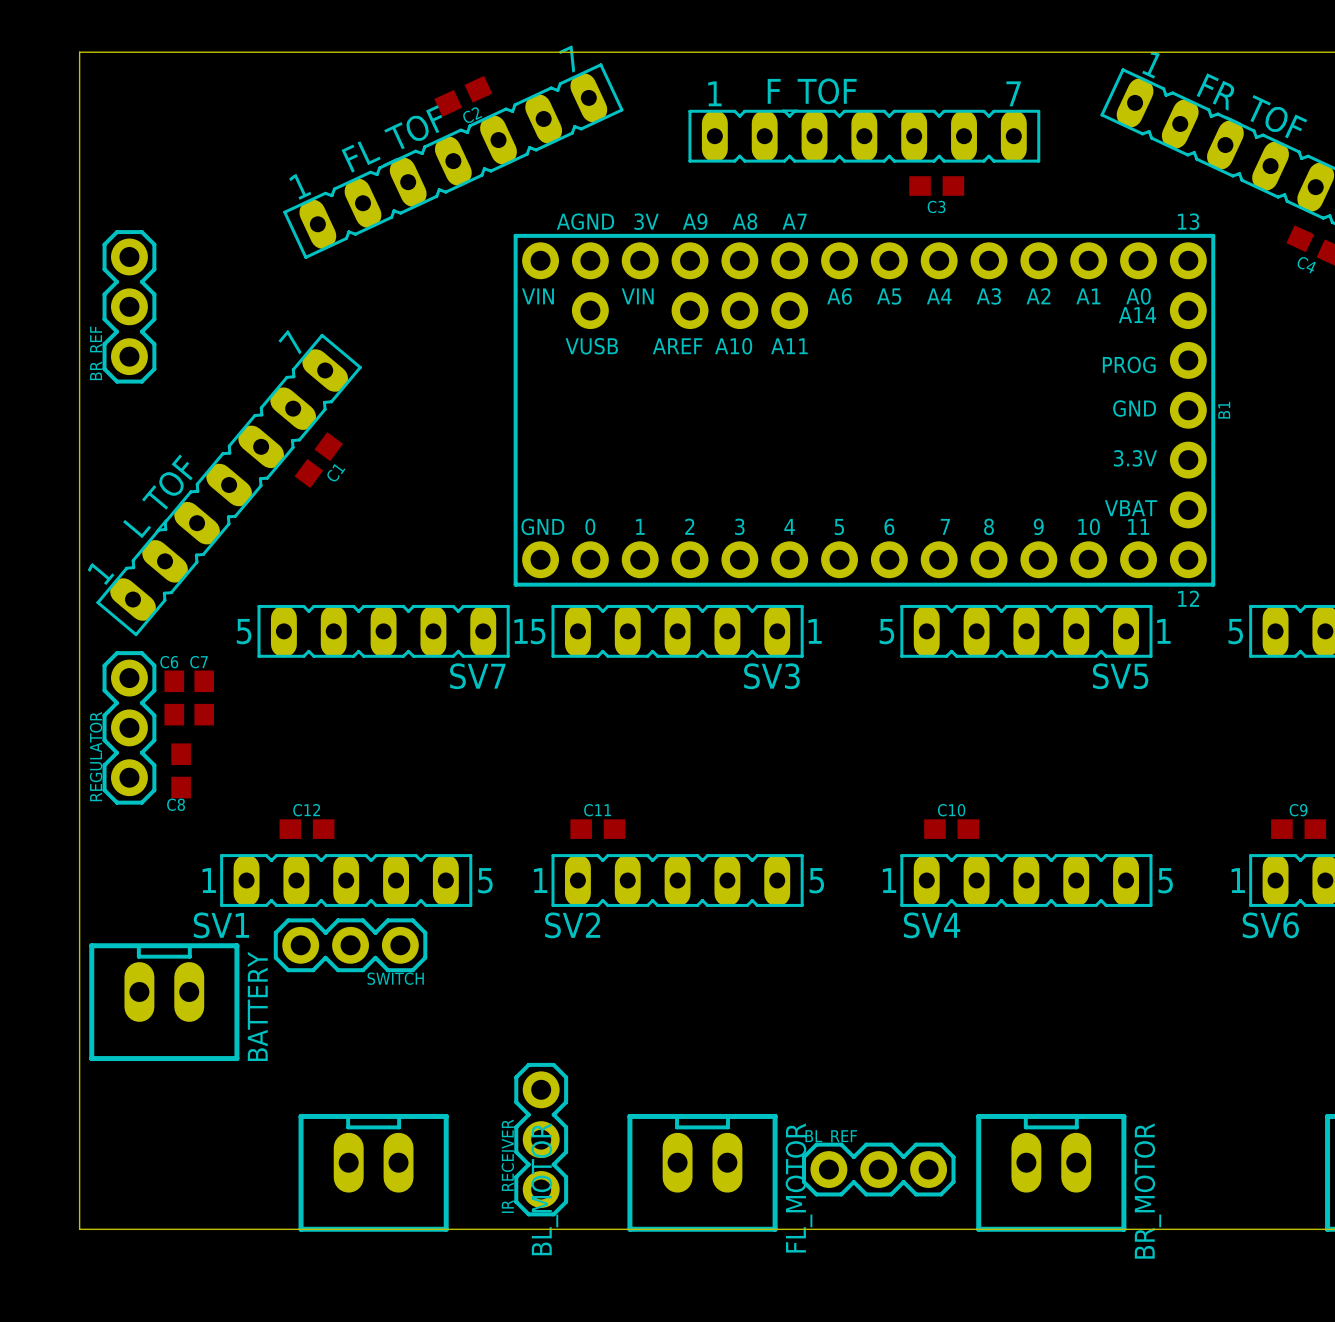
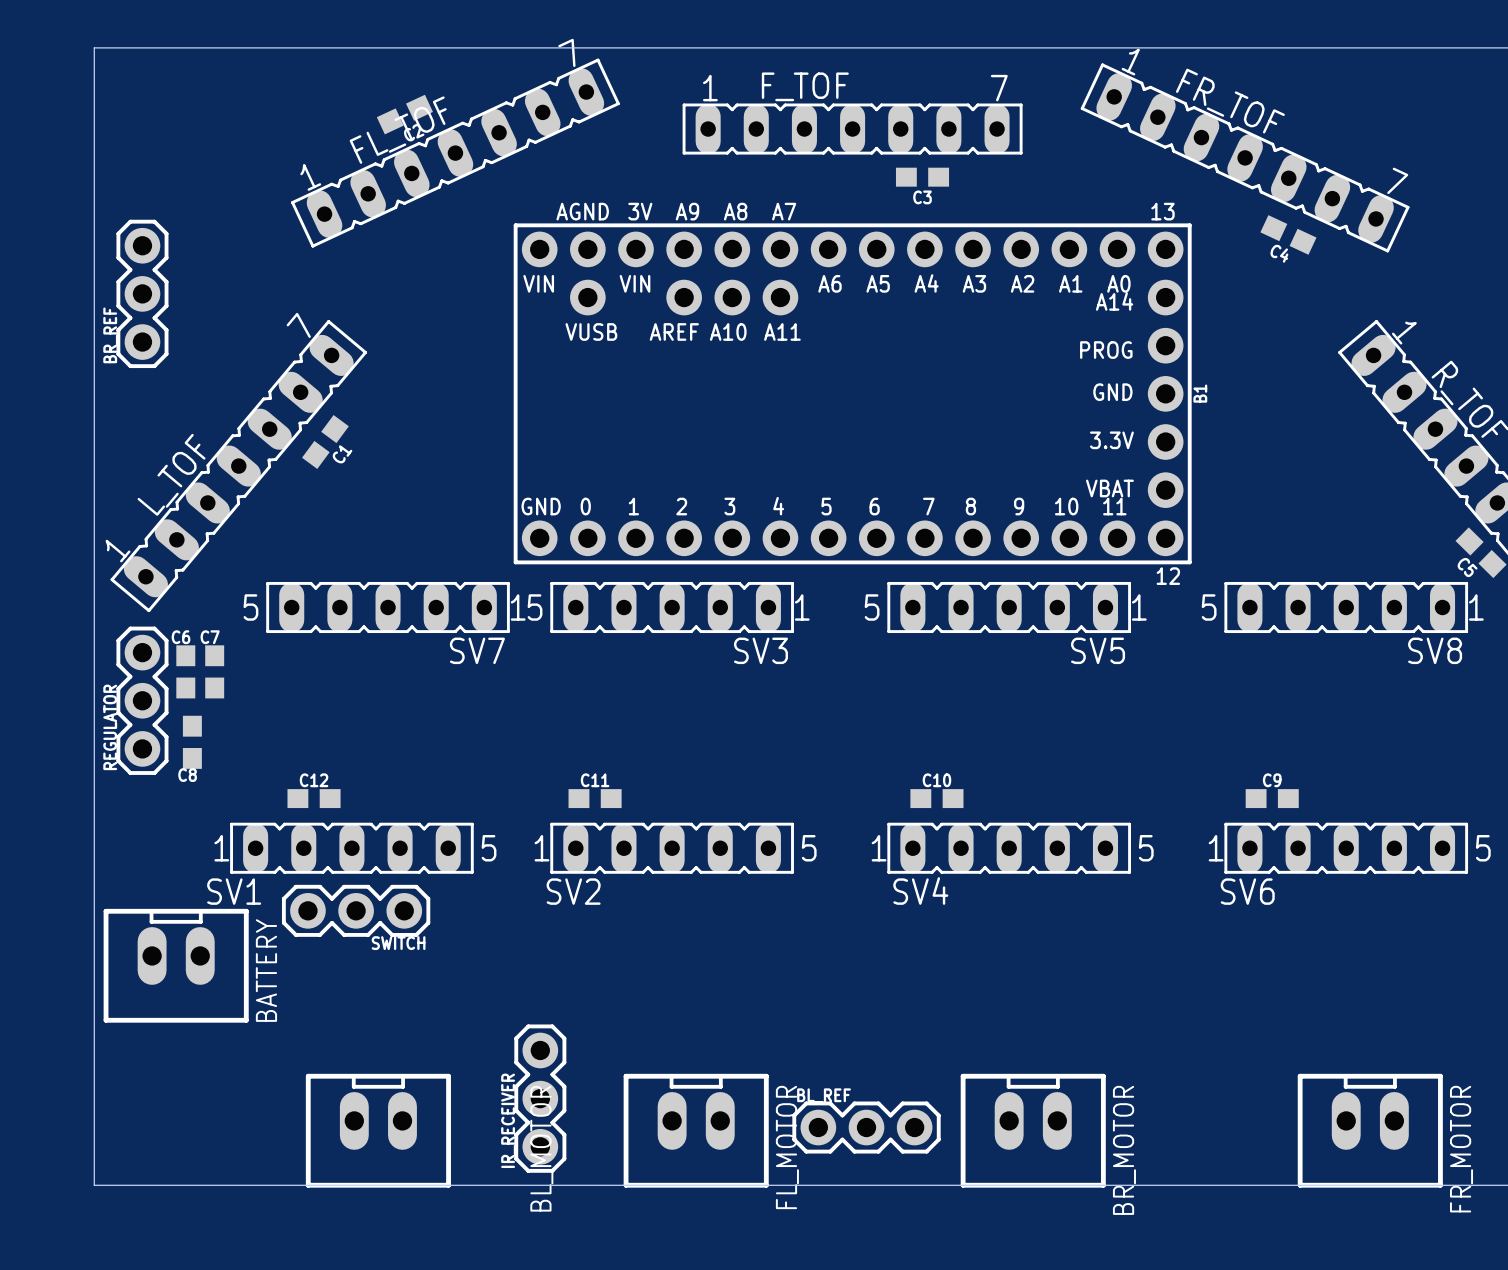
C2 position: (463, 96) -> (404, 114)

